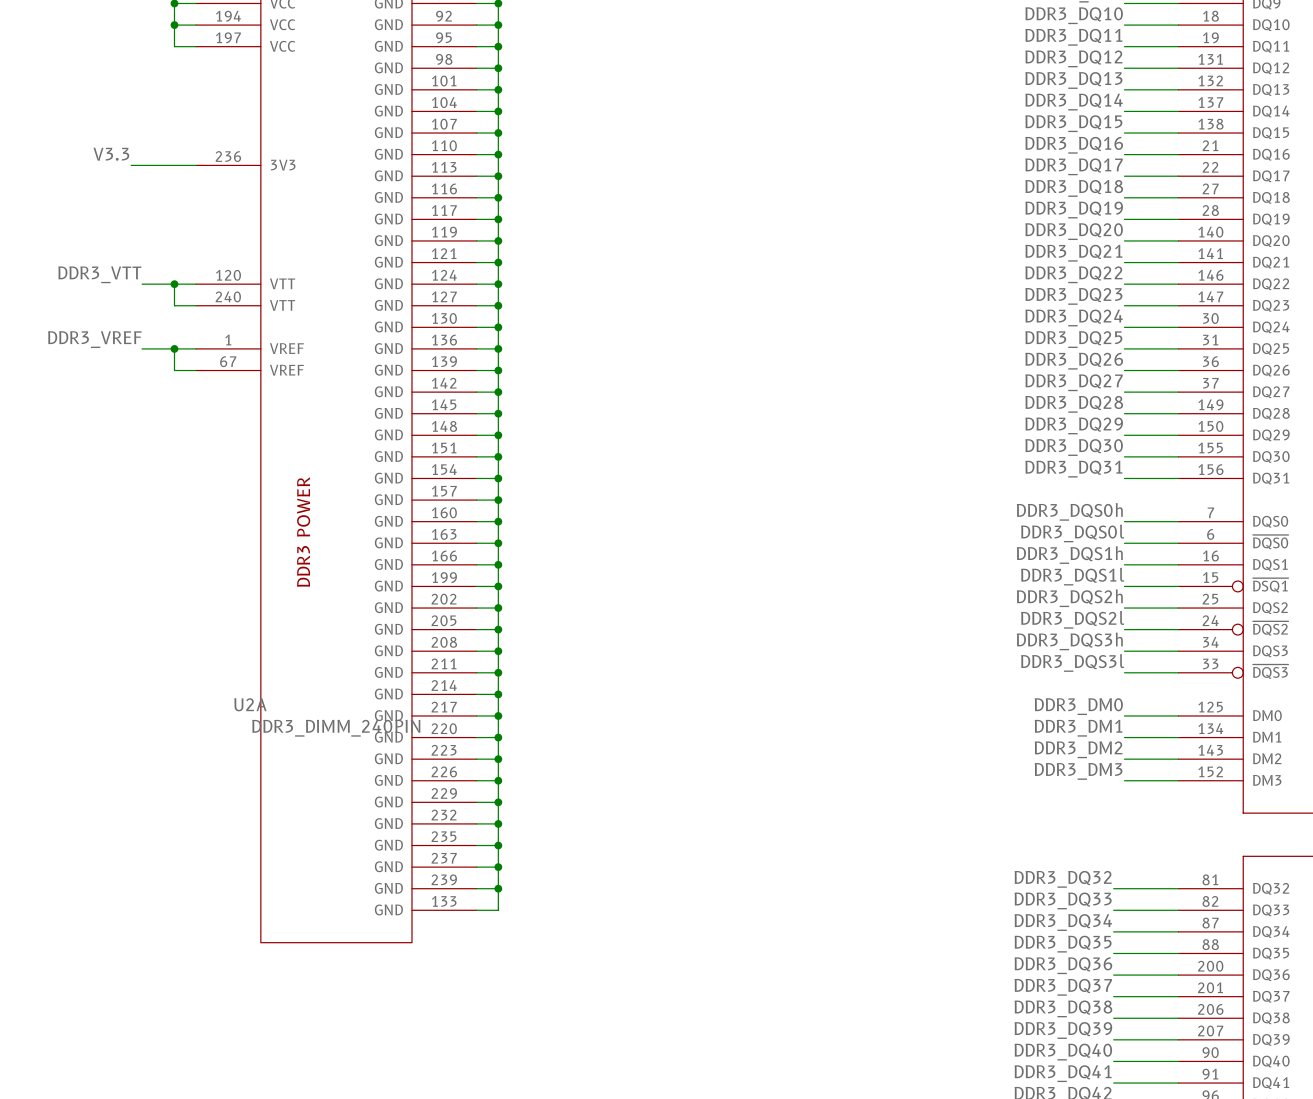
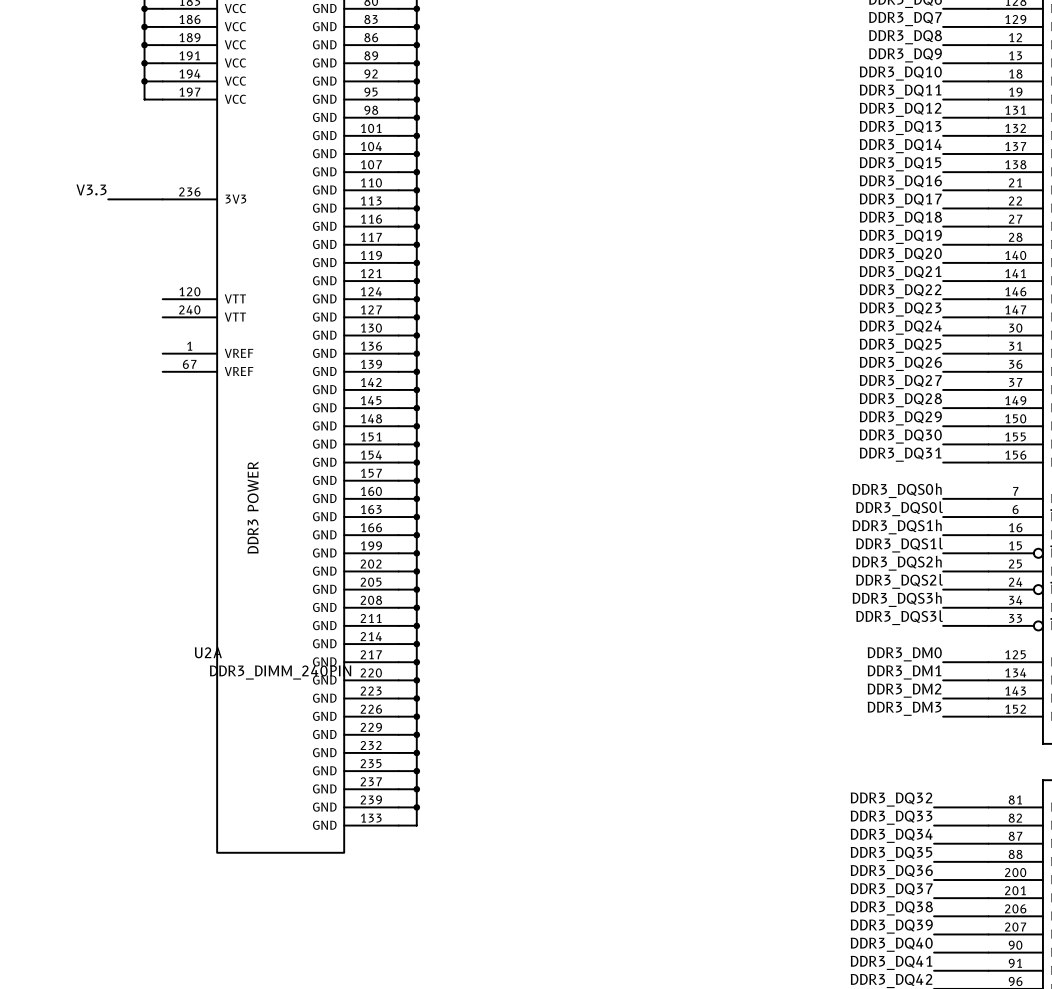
label: DDR3_VTT (99, 274) -> none
wire: (142, 284) (196, 284) -> none
wire: (174, 284) (174, 305) (196, 305) -> none
junction: (174, 284) -> none
label: DDR3_VREF (94, 339) -> none
wire: (142, 348) (196, 348) -> none
wire: (174, 348) (174, 370) (196, 370) -> none
junction: (174, 348) -> none

